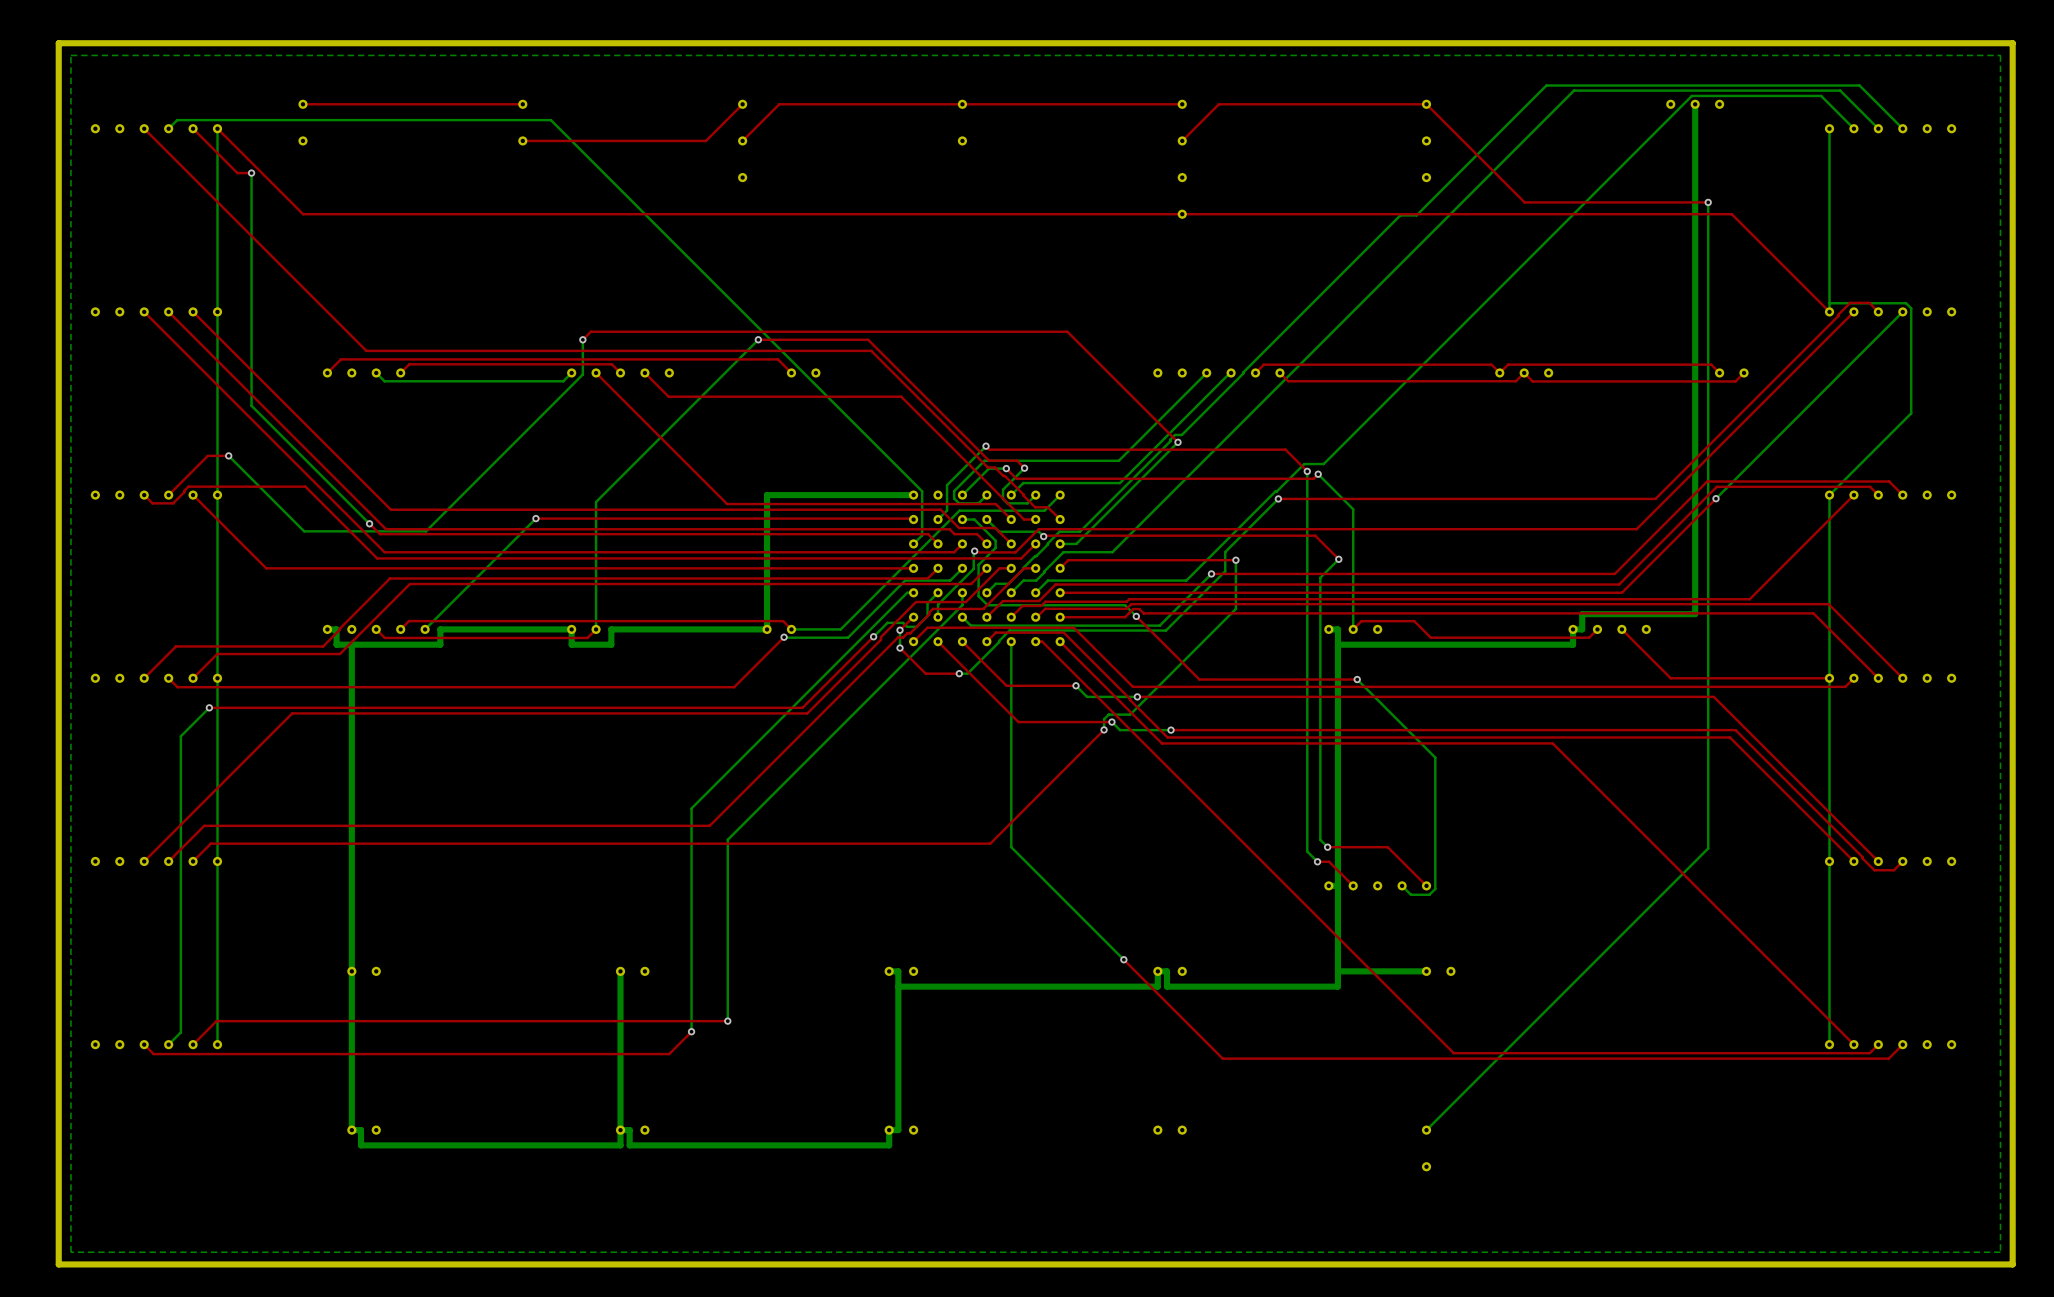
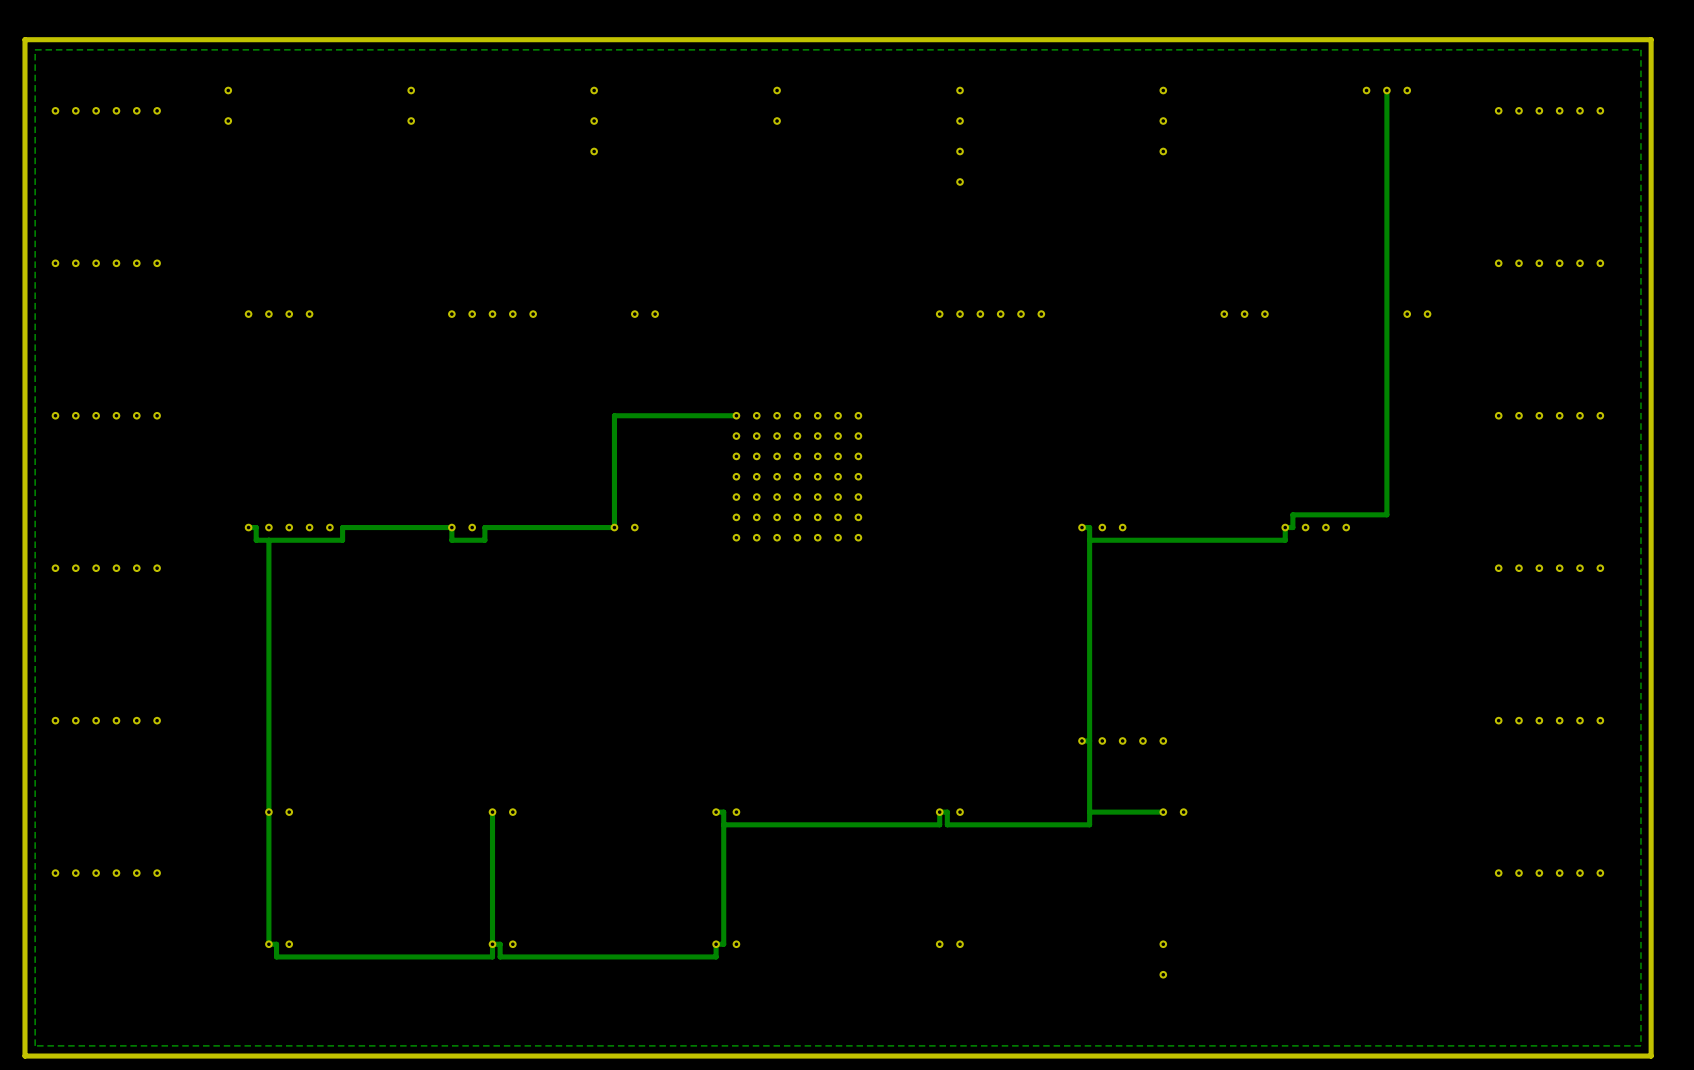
top track: (302, 104) (522, 104) -> none
top track: (742, 104) (705, 140) (522, 140) -> none
top track: (1182, 104) (779, 104) (742, 140) -> none
top track: (144, 128) (366, 350) (871, 350) (987, 467) (994, 467) (1004, 475) (1035, 507) (1047, 507) (1060, 519) -> none
bottom track: (168, 128) (177, 120) (550, 120) (922, 491) (922, 535) (913, 543) -> none
top track: (193, 128) (237, 173) (251, 173) -> none
top track: (217, 128) (303, 214) (1731, 214) (1829, 311) -> none
bottom track: (217, 128) (217, 1044) -> none
bottom track: (1829, 128) (1829, 311) -> none
bottom track: (1853, 128) (1821, 95) (1691, 95) (1323, 464) (1304, 464) (1186, 580) (1047, 580) (1035, 592) -> none
bottom track: (1878, 128) (1840, 90) (1574, 90) (1112, 552) (1063, 552) (1036, 580) (1023, 580) (1011, 592) -> none
bottom track: (1902, 128) (1859, 85) (1546, 85) (1416, 215) (1400, 215) (1181, 434) (1174, 434) (1079, 531) (1059, 531) (1008, 583) (995, 583) (986, 592) -> none
top track: (1182, 140) (1218, 104) (1426, 104) (1524, 202) (1708, 202) -> none
bottom track: (251, 173) (251, 405) (369, 523) -> none
via: (251, 173) -> none
bottom track: (1708, 202) (1708, 848) (1426, 1130) -> none
via: (1708, 202) -> none
bottom track: (1829, 303) (1906, 303) (1911, 308) (1911, 413) (1829, 495) (1829, 1044) -> none
top track: (144, 311) (384, 552) (954, 552) (962, 543) -> none
top track: (168, 311) (386, 529) (949, 529) (954, 534) (977, 534) (986, 543) -> none
top track: (193, 311) (390, 509) (940, 509) (959, 528) (995, 528) (1011, 543) -> none
top track: (1853, 311) (1636, 529) (1038, 529) (1015, 552) (974, 551) -> none
top track: (1878, 311) (1869, 302) (1850, 302) (1655, 498) (1278, 498) -> none
bottom track: (1902, 311) (1716, 498) -> none
top track: (582, 339) (590, 331) (1067, 331) (1178, 442) -> none
bottom track: (582, 339) (582, 374) (426, 531) (304, 531) (228, 455) -> none
via: (582, 339) -> none
top track: (758, 339) (868, 339) (989, 460) (1017, 460) (1024, 468) -> none
bottom track: (758, 339) (596, 502) (596, 629) -> none
via: (758, 339) -> none
top track: (327, 372) (340, 359) (777, 359) (791, 372) -> none
bottom track: (376, 372) (384, 381) (563, 381) (571, 372) -> none
top track: (400, 372) (409, 364) (611, 364) (620, 372) -> none
top track: (596, 372) (727, 504) (995, 504) (1011, 519) -> none
top track: (644, 372) (668, 396) (901, 396) (1024, 519) (1035, 519) -> none
bottom track: (1206, 372) (1118, 460) (984, 460) (954, 491) (954, 498) (959, 503) (978, 503) (986, 495) -> none
bottom track: (1231, 372) (1119, 483) (1023, 483) (1011, 495) -> none
top track: (1255, 372) (1263, 364) (1491, 364) (1499, 372) (1508, 364) (1711, 364) (1719, 372) -> none
top track: (1279, 372) (1288, 381) (1515, 381) (1524, 372) (1532, 381) (1735, 381) (1744, 372) -> none
bottom track: (1178, 442) (1076, 543) (1060, 543) -> none
via: (1178, 442) -> none
top track: (986, 446) (989, 449) (1285, 449) (1307, 471) -> none
bottom track: (986, 446) (947, 485) (947, 510) (938, 519) -> none
via: (986, 446) -> none
top track: (228, 455) (207, 455) (168, 495) -> none
via: (228, 455) -> none
top track: (1006, 468) (1016, 478) (1313, 478) (1318, 474) -> none
bottom track: (1006, 468) (988, 468) (962, 495) -> none
via: (1006, 468) -> none
bottom track: (1024, 468) (1003, 489) (1003, 498) (1007, 503) (1027, 503) (1035, 495) -> none
via: (1024, 468) -> none
bottom track: (1307, 471) (1307, 851) (1317, 861) -> none
via: (1307, 471) -> none
bottom track: (1318, 474) (1353, 509) (1353, 629) -> none
via: (1318, 474) -> none
top track: (144, 495) (152, 503) (173, 503) (188, 486) (305, 486) (377, 558) (1021, 558) (1035, 543) -> none
top track: (193, 495) (266, 568) (913, 568) -> none
bottom track: (1060, 495) (1044, 510) (959, 510) (840, 629) (791, 629) -> none
top track: (1853, 495) (1749, 599) (1129, 599) (1126, 601) (1045, 601) (1041, 605) (1022, 605) (1011, 617) -> none
top track: (1878, 495) (1870, 486) (1716, 486) (1619, 584) (1055, 584) (1039, 601) (1003, 601) (986, 617) -> none
top track: (1902, 495) (1889, 481) (1707, 481) (1614, 573) (1211, 573) -> none
bottom track: (1278, 498) (1225, 552) (1225, 571) (1165, 630) (1009, 630) (967, 673) (959, 673) -> none
via: (1278, 498) -> none
top track: (1716, 498) (1621, 592) (1060, 592) -> none
via: (1716, 498) -> none
top track: (535, 518) (913, 519) -> none
bottom track: (535, 518) (425, 629) -> none
via: (535, 518) -> none
bottom track: (962, 519) (974, 519) (995, 540) (995, 547) (978, 564) (978, 596) (987, 605) (1125, 605) (1136, 616) -> none
bottom track: (986, 519) (999, 531) (1038, 531) (1043, 536) -> none
top track: (369, 523) (379, 534) (928, 534) (938, 543) -> none
via: (369, 523) -> none
top track: (1043, 536) (1315, 535) (1338, 559) -> none
via: (1043, 536) -> none
bottom track: (974, 551) (973, 568) (938, 604) (938, 617) -> none
via: (974, 551) -> none
bottom track: (1338, 559) (1320, 577) (1320, 839) (1327, 847) -> none
via: (1338, 559) -> none
top track: (1235, 560) (1068, 560) (1060, 568) -> none
bottom track: (1235, 560) (1235, 608) (1130, 714) (1108, 714) (1104, 719) (1104, 729) -> none
via: (1235, 560) -> none
top track: (938, 568) (927, 578) (389, 578) (323, 646) (176, 646) (144, 678) -> none
bottom track: (962, 568) (950, 580) (905, 580) (848, 637) (784, 637) -> none
top track: (986, 568) (971, 584) (409, 584) (339, 654) (217, 654) (193, 678) -> none
top track: (1011, 568) (999, 568) (965, 602) (916, 602) (807, 713) (292, 713) (144, 861) -> none
top track: (1035, 568) (1024, 568) (983, 608) (932, 608) (910, 633) (903, 637) (897, 637) (709, 825) (204, 825) (168, 861) -> none
bottom track: (1211, 573) (1159, 625) (970, 625) (962, 617) -> none
via: (1211, 573) -> none
bottom track: (913, 592) (907, 592) (691, 808) (691, 1031) -> none
bottom track: (938, 592) (927, 603) (927, 616) (916, 626) (907, 626) (903, 622) (887, 622) (873, 636) -> none
bottom track: (962, 592) (962, 605) (727, 839) (727, 1021) -> none
top track: (1136, 616) (1199, 679) (1357, 679) -> none
via: (1136, 616) -> none
top track: (913, 617) (900, 630) -> none
top track: (1035, 617) (1045, 608) (1126, 608) (1131, 604) (1828, 604) (1902, 678) -> none
top track: (1060, 617) (1125, 617) (1133, 609) (1139, 609) (1143, 613) (1813, 613) (1878, 678) -> none
top track: (376, 629) (384, 637) (587, 637) (596, 629) -> none
top track: (400, 629) (409, 621) (783, 621) (791, 629) -> none
top track: (1353, 629) (1361, 621) (1414, 621) (1430, 637) (1589, 637) (1597, 629) -> none
top track: (1621, 629) (1670, 678) (1829, 678) -> none
bottom track: (900, 630) (900, 648) -> none
via: (900, 630) -> none
top track: (873, 636) (802, 707) (209, 707) -> none
via: (873, 636) -> none
top track: (784, 637) (734, 687) (177, 687) (168, 678) -> none
via: (784, 637) -> none
top track: (913, 641) (927, 627) (1073, 627) (1132, 686) (1845, 686) (1853, 678) -> none
top track: (938, 641) (1018, 722) (1111, 722) -> none
top track: (962, 641) (1006, 685) (1076, 685) -> none
top track: (986, 641) (995, 632) (1063, 632) (1167, 737) (1729, 737) (1853, 861) -> none
bottom track: (1011, 641) (1011, 847) (1123, 959) -> none
top track: (1035, 641) (1042, 641) (1453, 1053) (1869, 1053) (1878, 1044) -> none
top track: (1060, 641) (1161, 743) (1552, 743) (1853, 1044) -> none
top track: (900, 648) (925, 673) (959, 673) -> none
via: (900, 648) -> none
via: (959, 673) -> none
bottom track: (1357, 679) (1435, 757) (1435, 888) (1429, 894) (1411, 894) (1402, 885) -> none
via: (1357, 679) -> none
bottom track: (1076, 685) (1087, 696) (1137, 696) -> none
via: (1076, 685) -> none
top track: (1137, 696) (1713, 696) (1878, 861) -> none
via: (1137, 696) -> none
bottom track: (209, 707) (180, 736) (180, 1032) (168, 1044) -> none
via: (209, 707) -> none
bottom track: (1111, 722) (1119, 730) (1171, 730) -> none
via: (1111, 722) -> none
top track: (1104, 729) (990, 843) (210, 843) (193, 861) -> none
via: (1104, 729) -> none
top track: (1171, 730) (1735, 730) (1874, 870) (1894, 870) (1902, 861) -> none
via: (1171, 730) -> none
top track: (1327, 847) (1387, 847) (1426, 885) -> none
via: (1327, 847) -> none
top track: (1317, 861) (1329, 861) (1353, 885) -> none
via: (1317, 861) -> none
top track: (1123, 959) (1222, 1058) (1888, 1058) (1902, 1044) -> none
via: (1123, 959) -> none
top track: (727, 1021) (216, 1021) (193, 1044) -> none
via: (727, 1021) -> none
top track: (691, 1031) (669, 1054) (153, 1054) (144, 1044) -> none
via: (691, 1031) -> none

